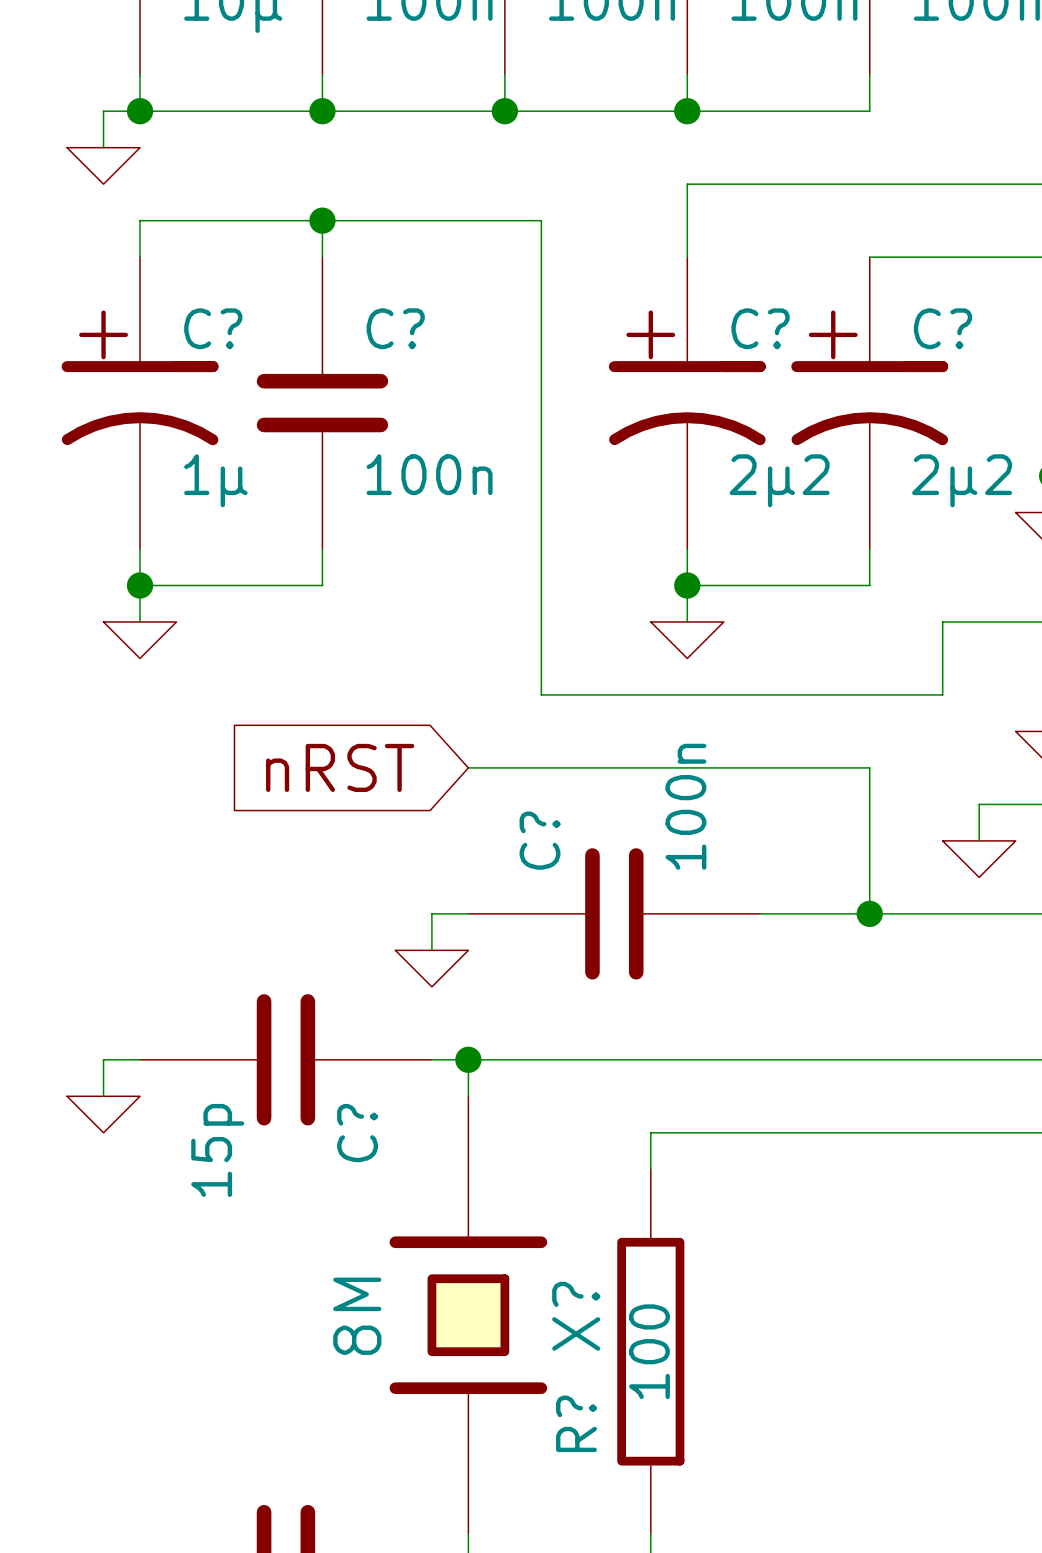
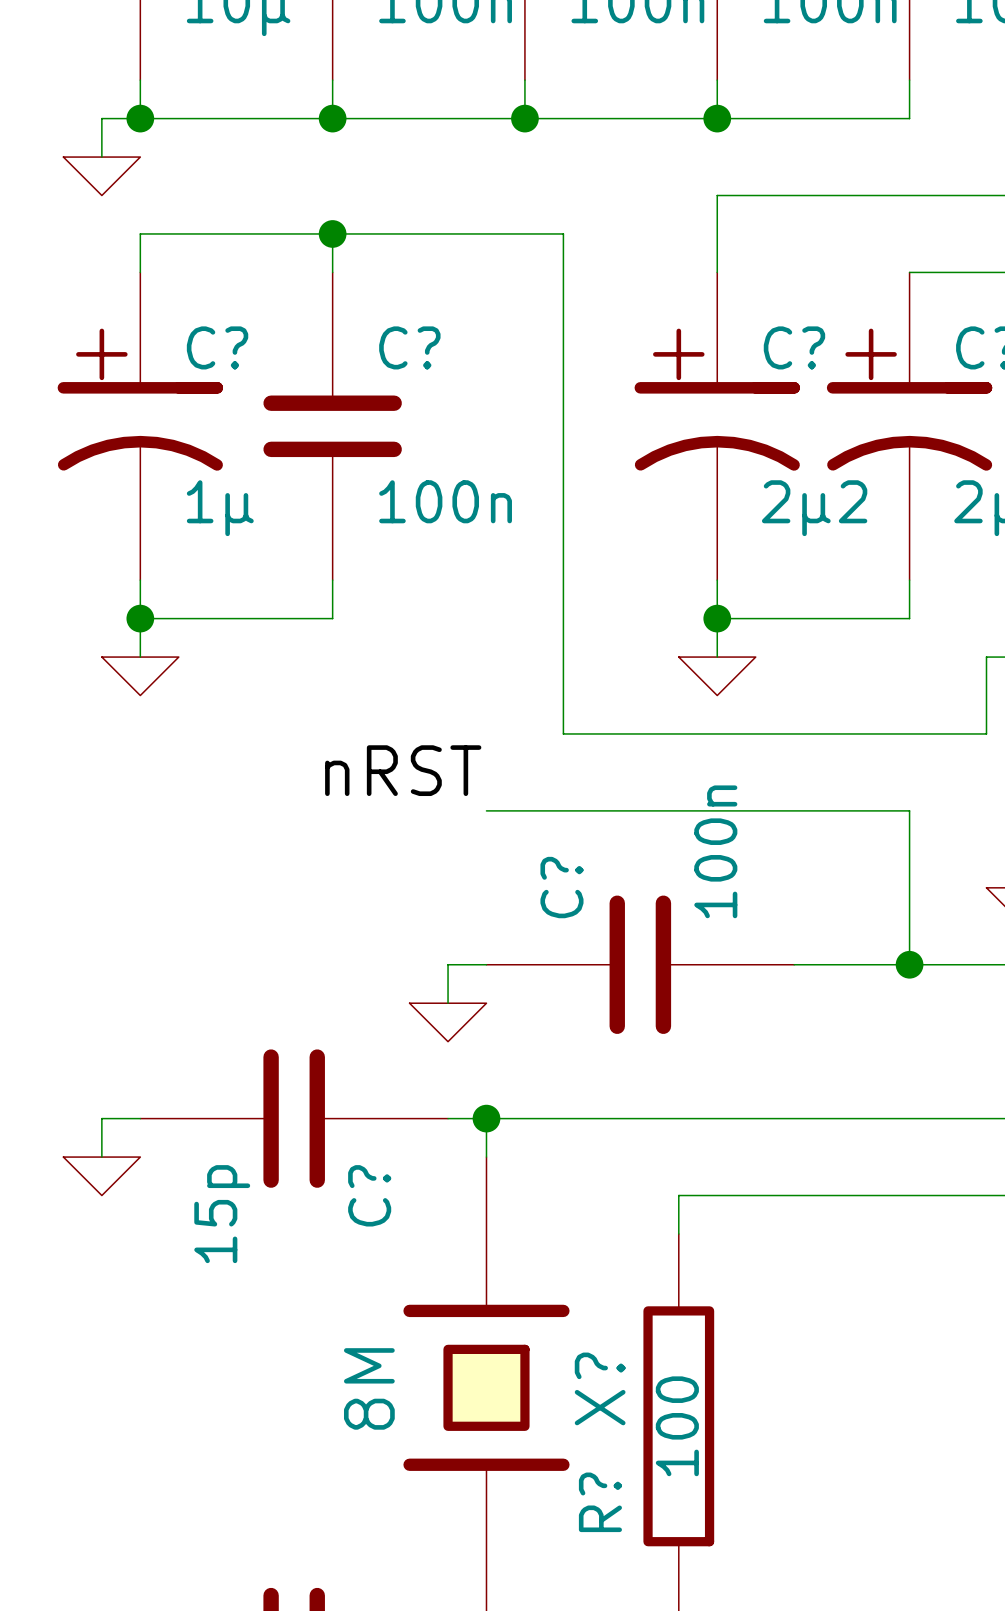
label: none -> nRST (403, 770)
global label: nRST (340, 767) -> none

